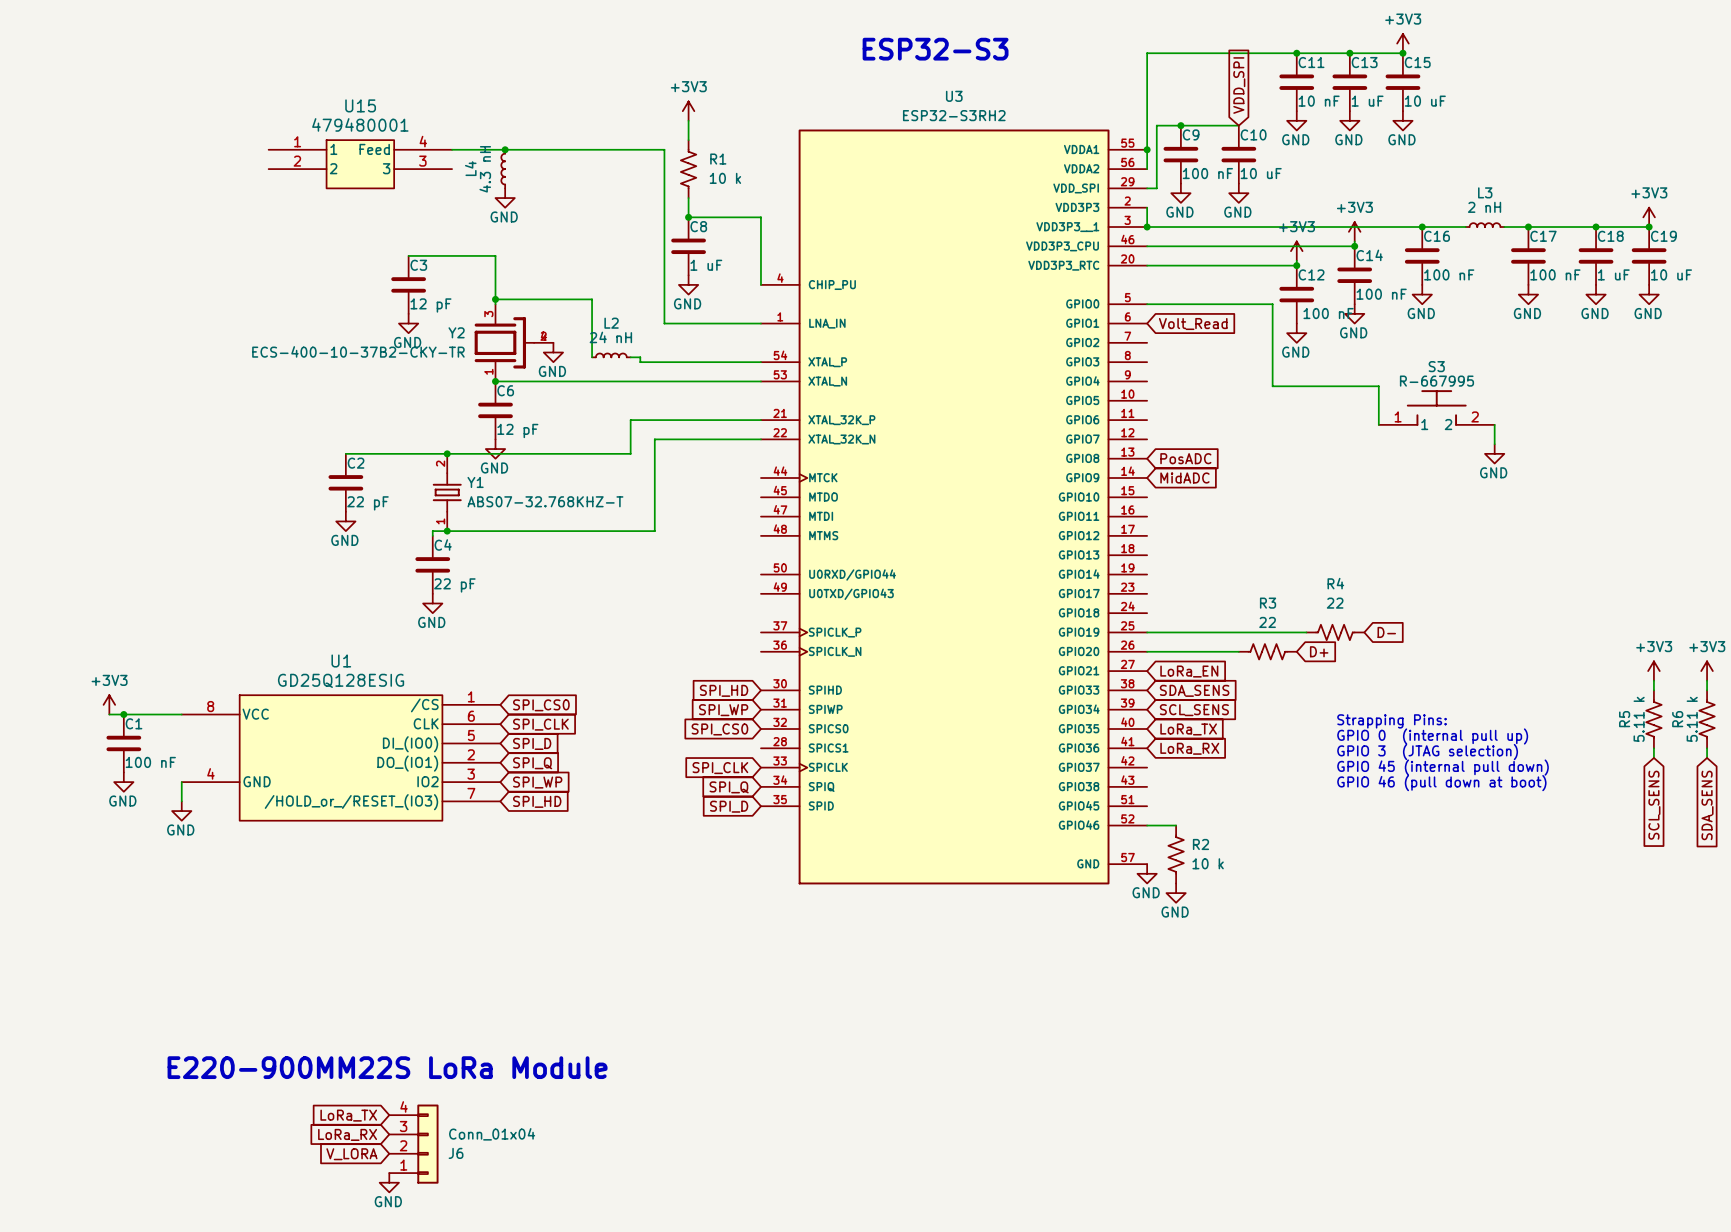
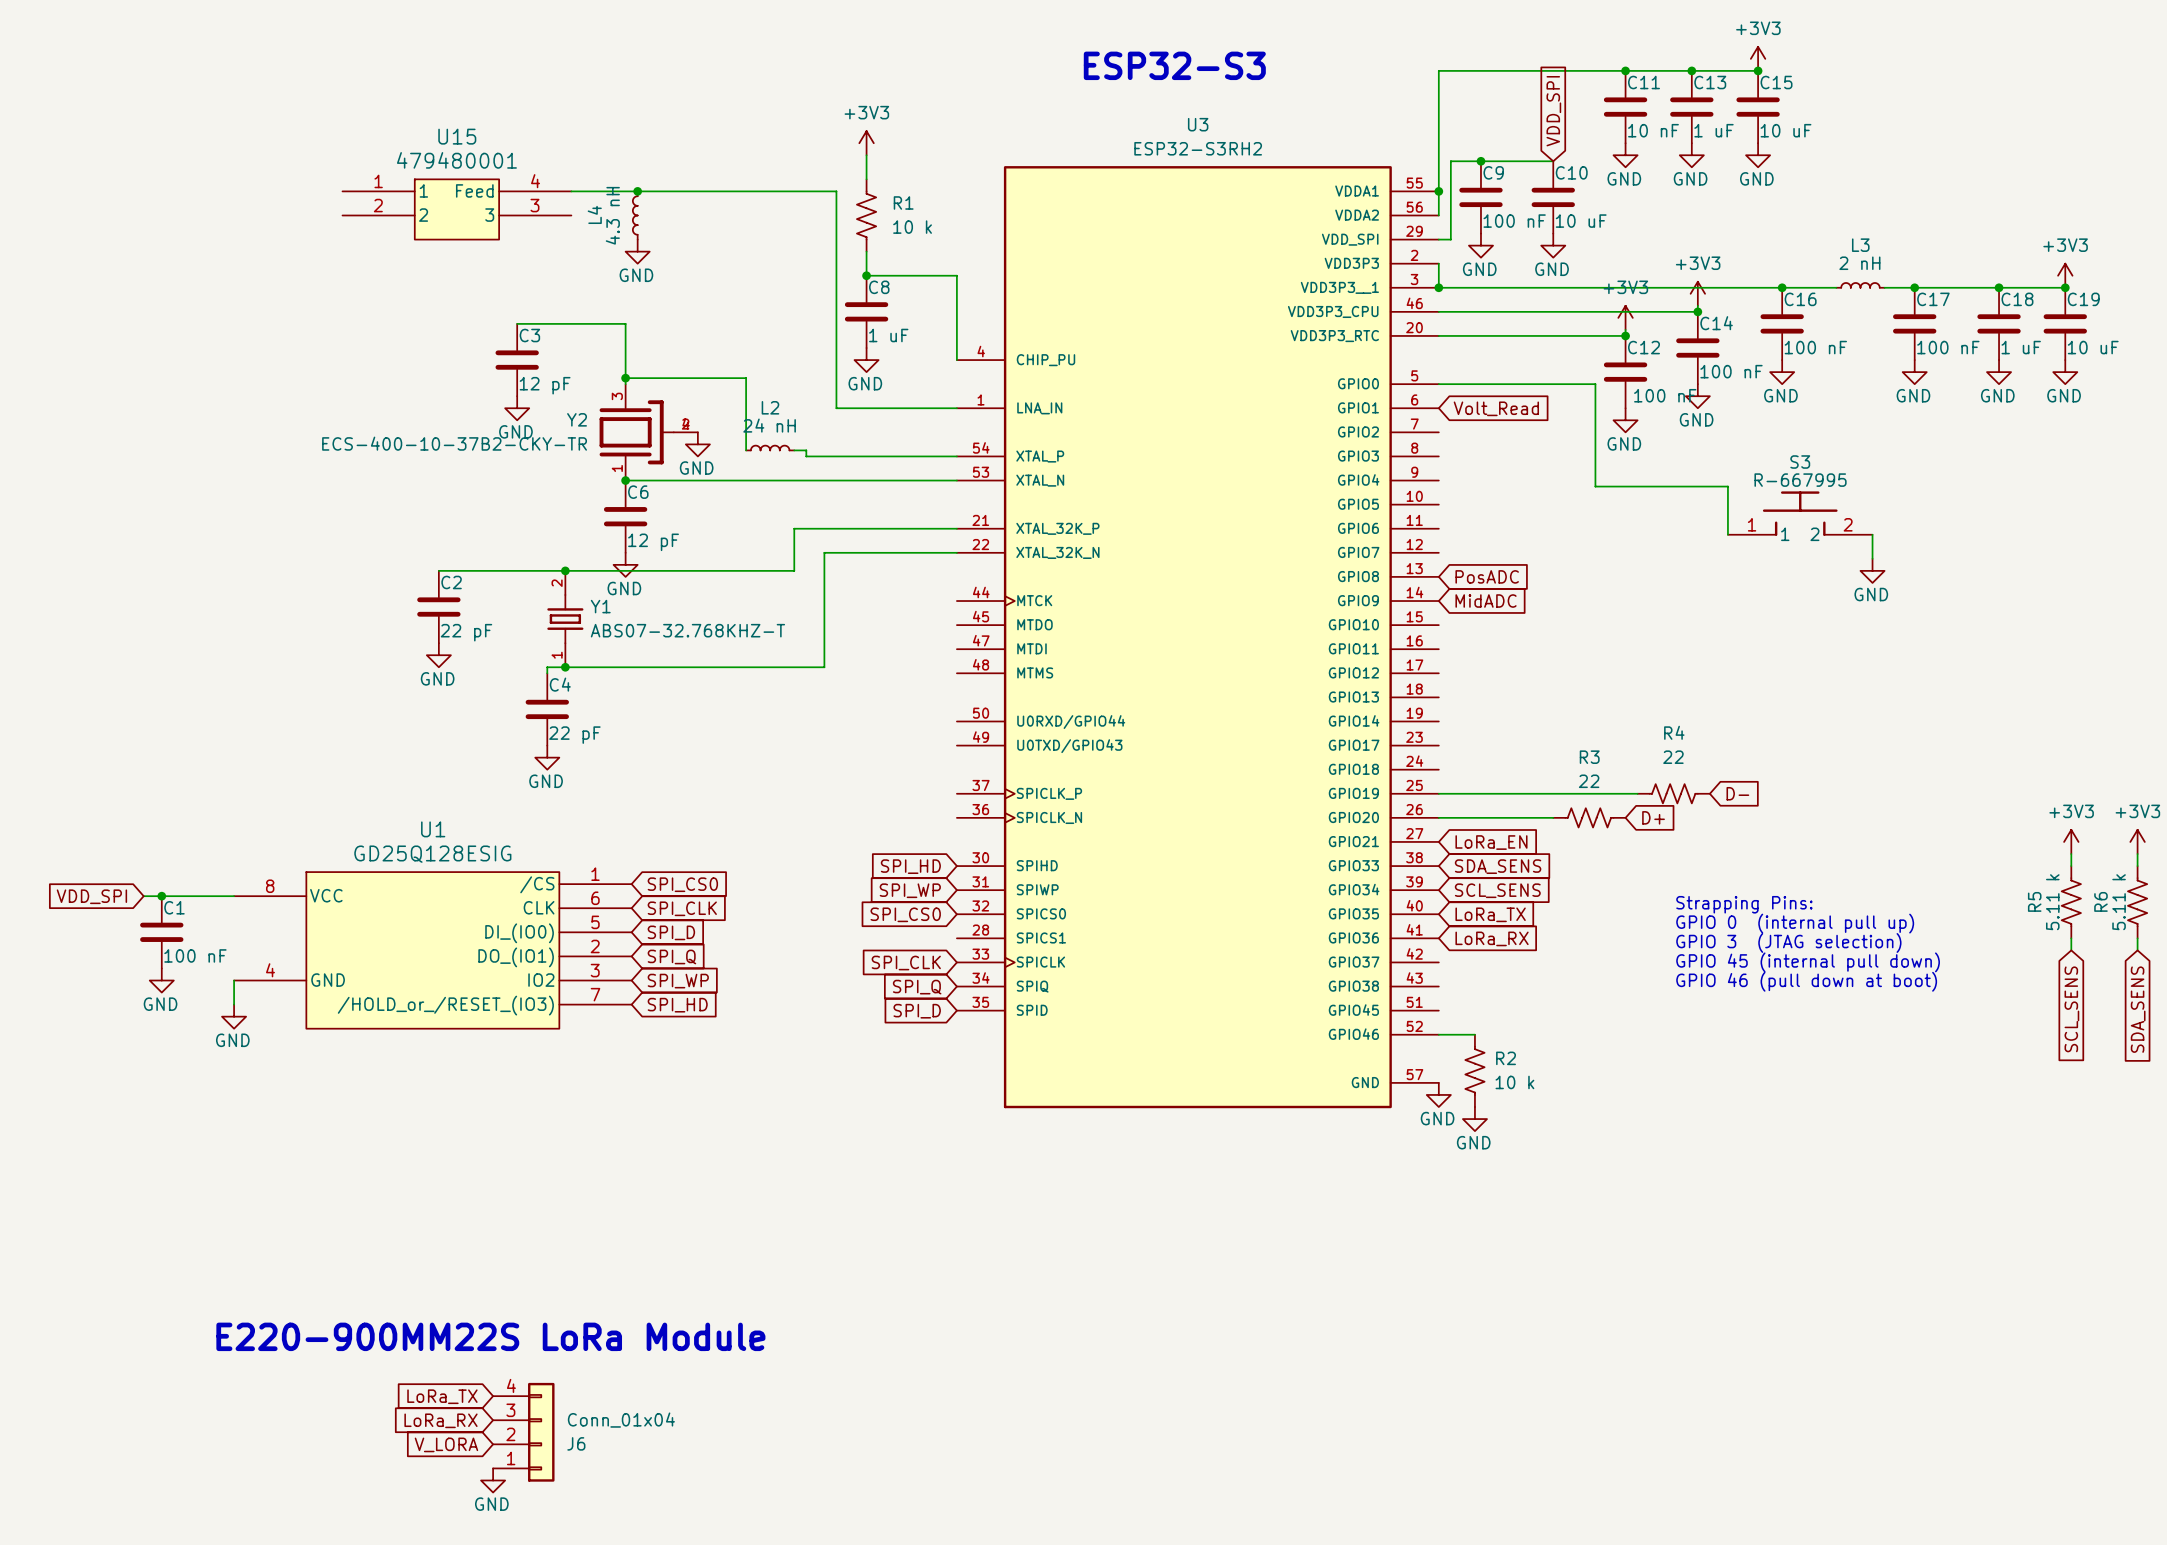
power symbol: +3V3 (109, 704) -> none
global label: none -> VDD_SPI (91, 896)

